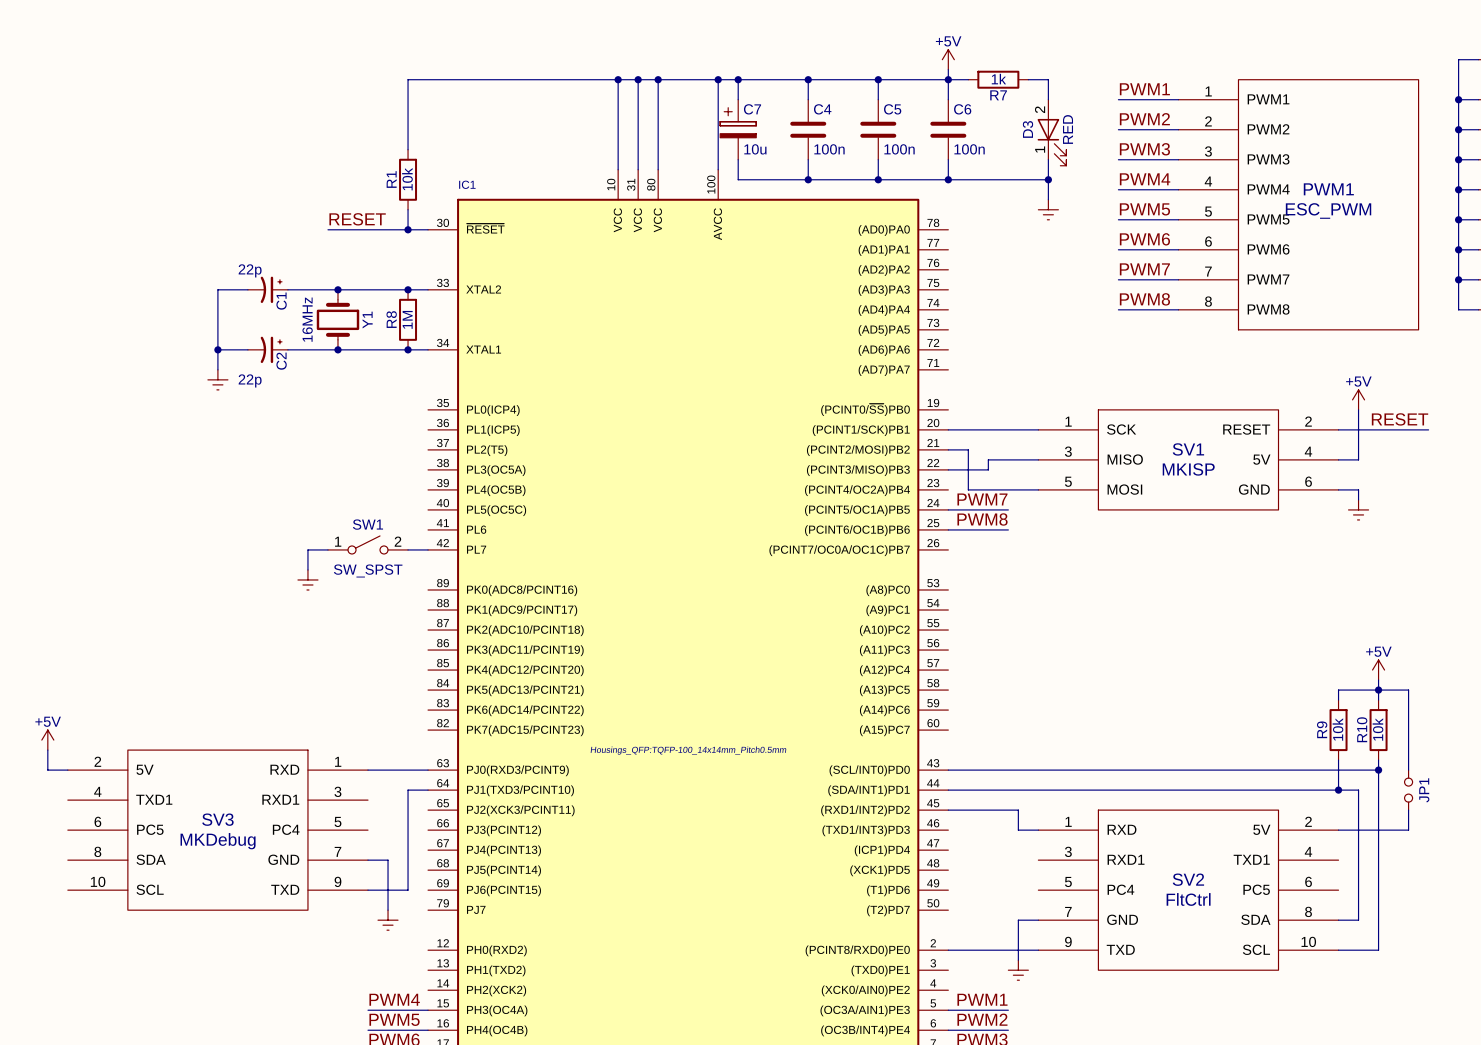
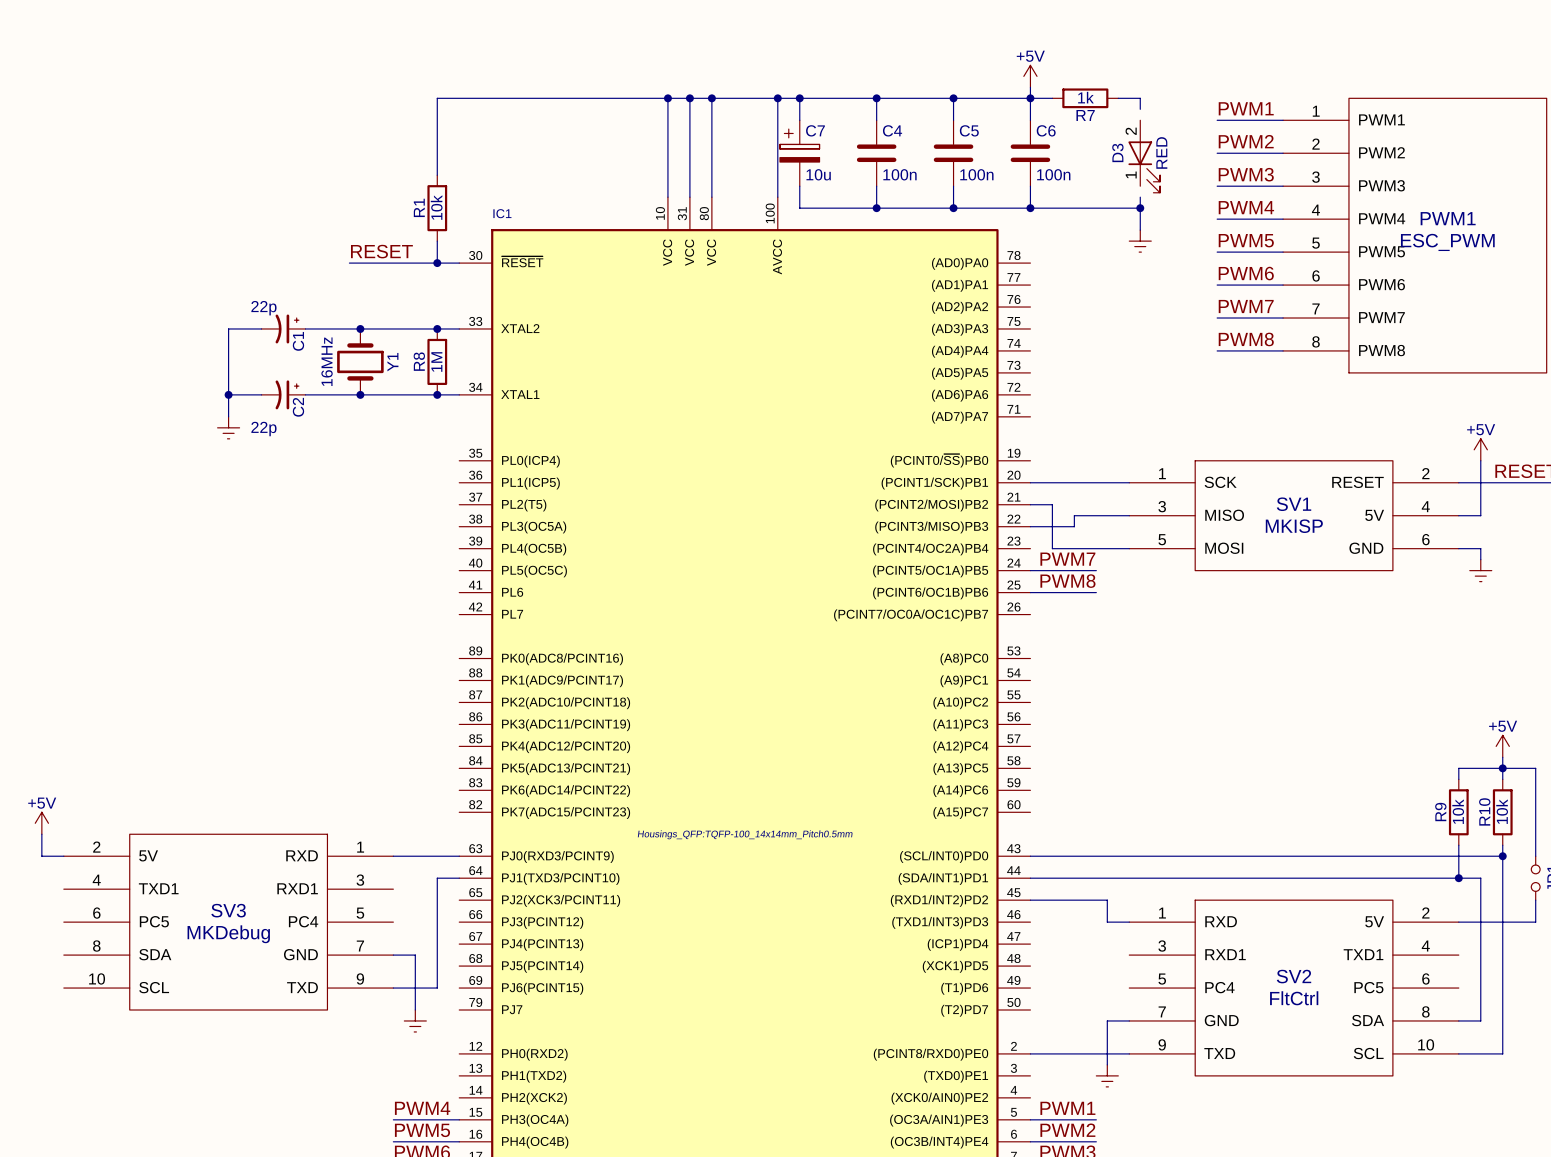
wire: (1048, 89) (1048, 99) -> none
wire: (1048, 159) (1048, 169) -> none
SW1: SW_SPST (368, 544) -> none
wire: (327, 549) (307, 549) (307, 569) -> none
wire: (408, 549) (428, 549) -> none
power symbol: (307, 579) -> none

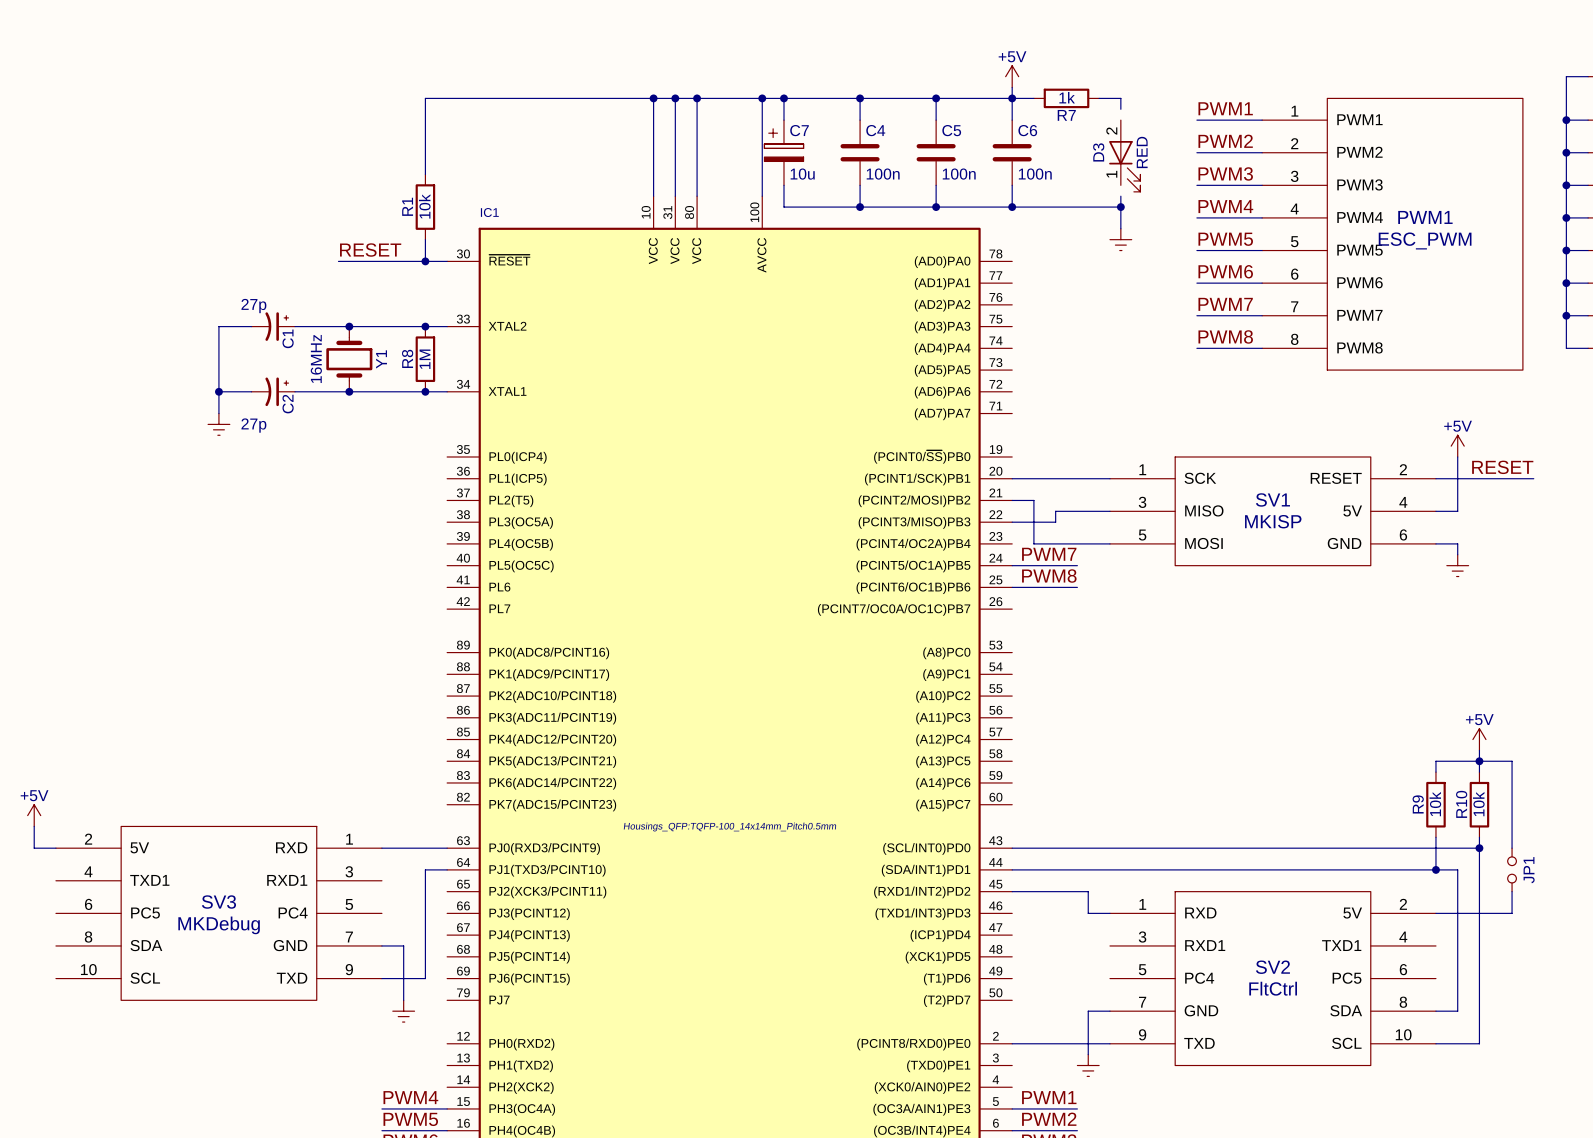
C1 value: 22p (263, 308) -> 27p (253, 306)
C2 value: 22p (263, 429) -> 27p (253, 425)

